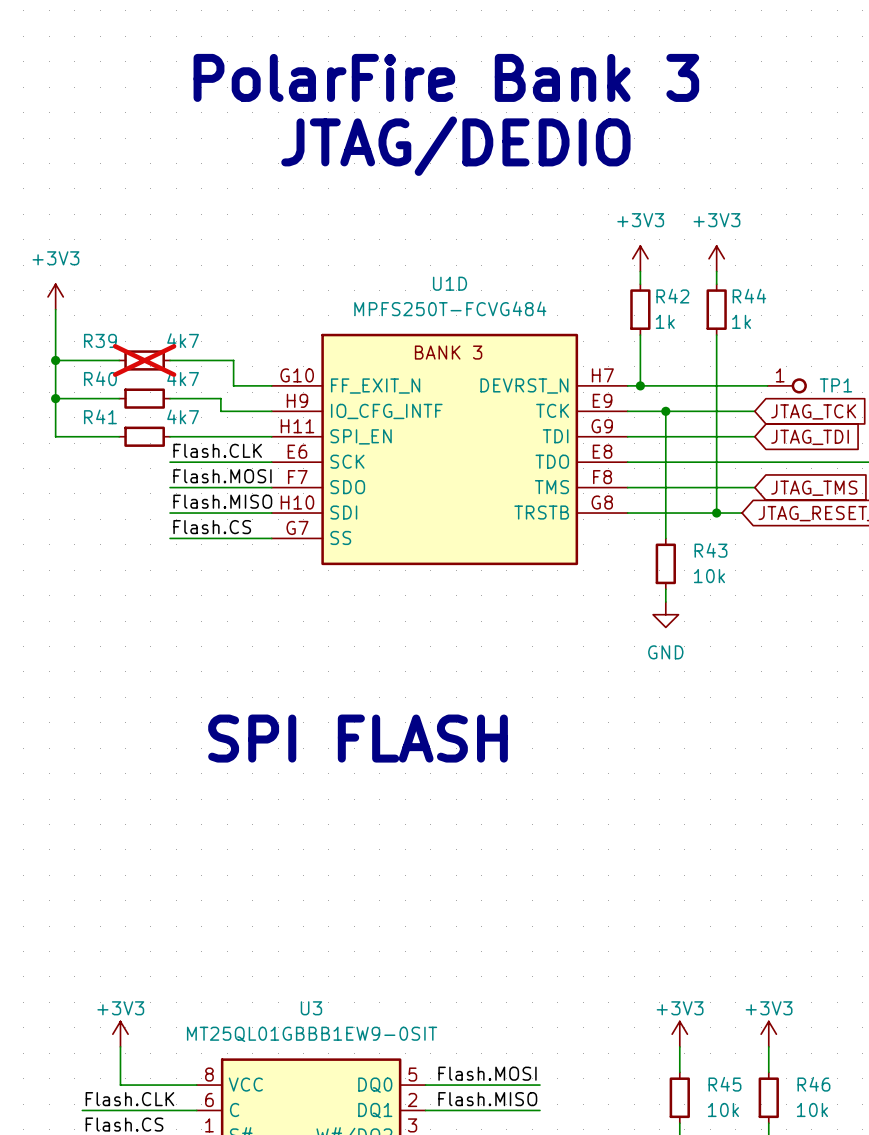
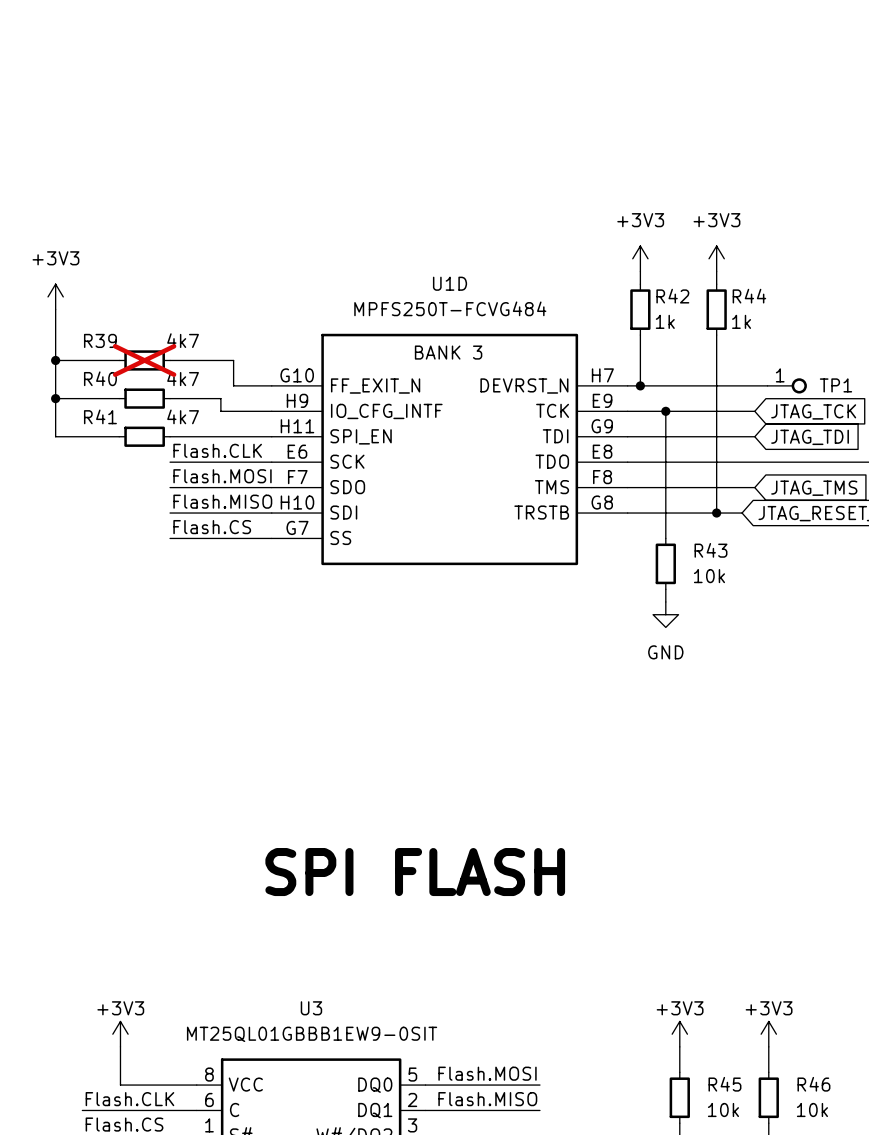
text: PolarFire Bank 3 (446, 77) -> none
text: JTAG/DEDIO (455, 146) -> none
text position: SPI FLASH (358, 738) -> SPI FLASH (415, 872)

